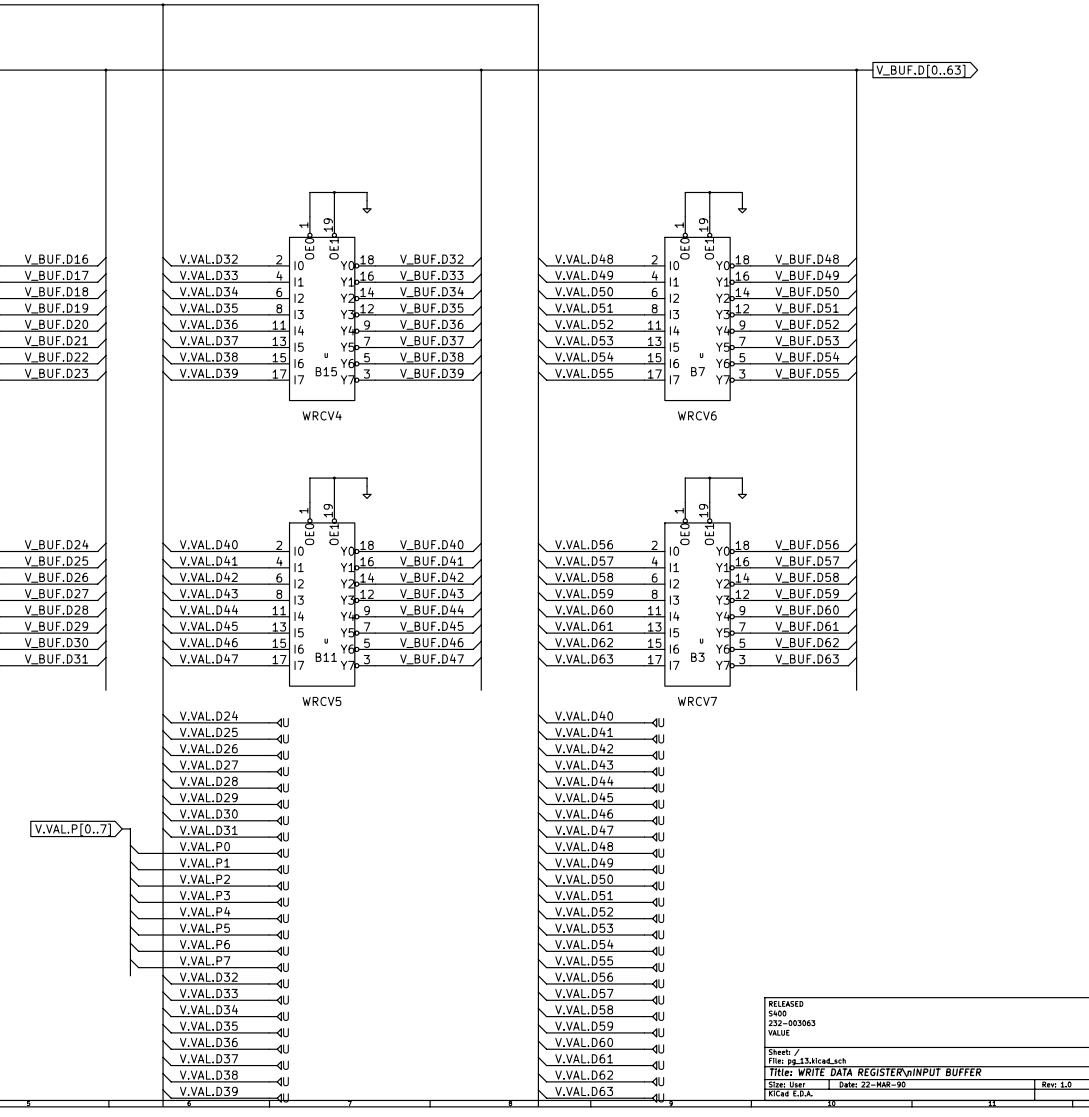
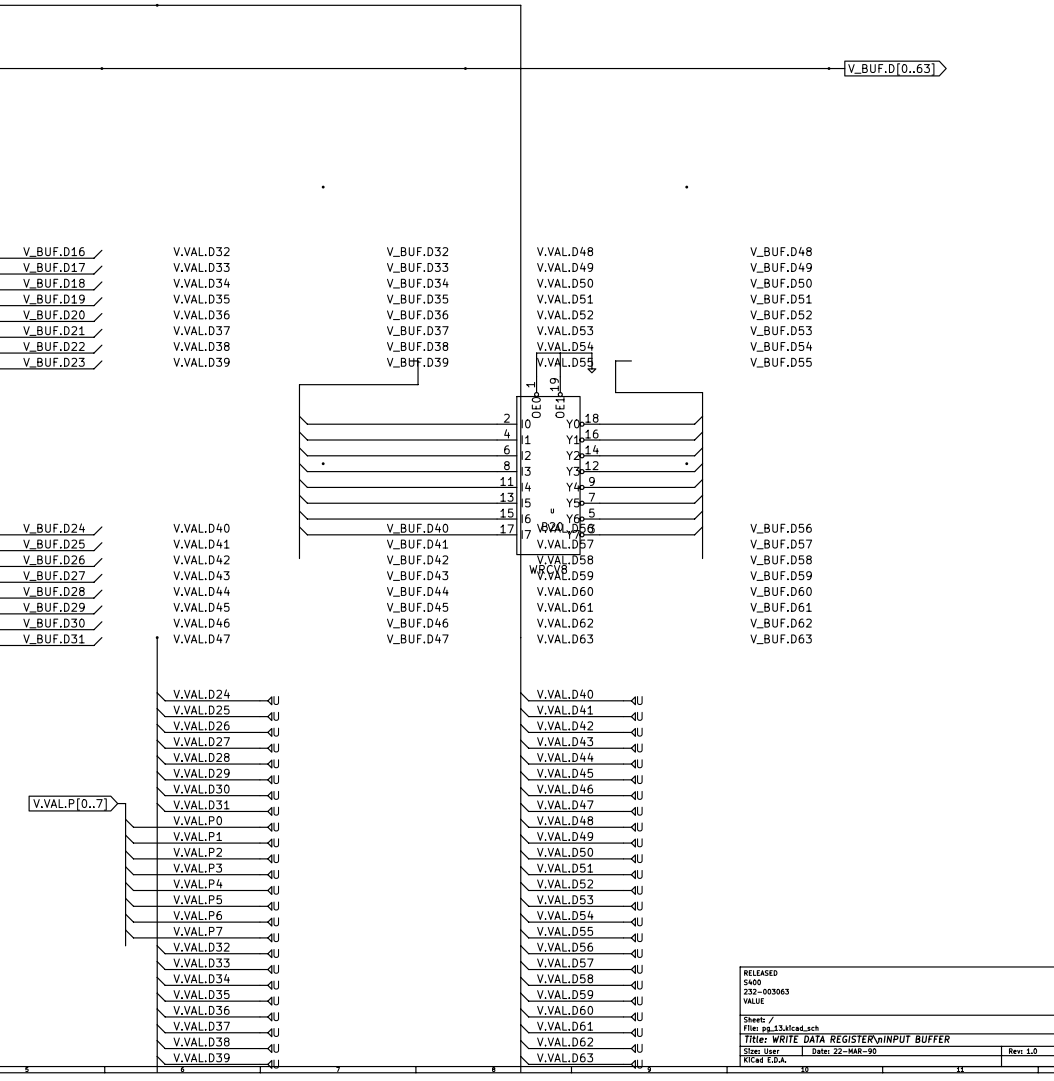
bus: (163, 4) (163, 657) -> none
bus: (105, 70) (105, 690) -> none
bus: (481, 70) (481, 690) -> none
bus: (856, 70) (856, 690) -> none
wire: (334, 192) (334, 216) -> none
wire: (709, 192) (709, 216) -> none
wire: (367, 200) (367, 192) (309, 192) (309, 216) -> none
wire: (742, 200) (742, 192) (685, 192) (685, 216) -> none
power symbol: (367, 206) -> none
power symbol: (742, 206) -> none
wire: (163, 257) (171, 265) (269, 265) -> none
wire: (481, 257) (473, 265) (375, 265) -> none
wire: (538, 257) (546, 265) (644, 265) -> none
wire: (856, 257) (848, 265) (750, 265) -> none
wire: (163, 274) (171, 282) (269, 282) -> none
wire: (481, 274) (473, 282) (375, 282) -> none
wire: (538, 274) (546, 282) (644, 282) -> none
wire: (856, 274) (848, 282) (750, 282) -> none
wire: (163, 290) (171, 298) (269, 298) -> none
wire: (481, 290) (473, 298) (375, 298) -> none
wire: (538, 290) (546, 298) (644, 298) -> none
wire: (856, 290) (848, 298) (750, 298) -> none
wire: (163, 306) (171, 314) (269, 314) -> none
wire: (481, 306) (473, 314) (375, 314) -> none
wire: (538, 306) (546, 314) (644, 314) -> none
wire: (856, 306) (848, 314) (750, 314) -> none
part: (322, 308) -> none
part: (697, 308) -> none
wire: (163, 323) (171, 331) (269, 331) -> none
wire: (481, 323) (473, 331) (375, 331) -> none
wire: (538, 323) (546, 331) (644, 331) -> none
wire: (856, 323) (848, 331) (750, 331) -> none
wire: (163, 339) (171, 347) (269, 347) -> none
wire: (481, 339) (473, 347) (375, 347) -> none
wire: (538, 339) (546, 347) (644, 347) -> none
wire: (856, 339) (848, 347) (750, 347) -> none
wire: (163, 355) (171, 363) (269, 363) -> none
wire: (481, 355) (473, 363) (375, 363) -> none
wire: (538, 355) (546, 363) (554, 363) -> (536, 376) (536, 353)
wire: (856, 355) (848, 363) (750, 363) -> none
wire: none -> (560, 353) (560, 376)
wire: (611, 363) (644, 363) -> (591, 353) (591, 360)
wire: (163, 371) (171, 380) (269, 380) -> none
bus: none -> (410, 360) (418, 360) (418, 384) (299, 384) (299, 558)
wire: (481, 371) (473, 380) (375, 380) -> none
wire: (538, 371) (546, 380) (644, 380) -> none
bus: none -> (631, 360) (615, 360) (615, 392) (702, 392) (702, 558)
wire: (856, 371) (848, 380) (750, 380) -> none
power symbol: none -> (591, 367)
wire: none -> (299, 416) (307, 424) (497, 424)
wire: none -> (702, 416) (694, 424) (599, 424)
wire: none -> (299, 432) (307, 440) (497, 440)
wire: none -> (702, 432) (694, 440) (599, 440)
wire: none -> (299, 447) (307, 455) (497, 455)
wire: none -> (702, 447) (694, 455) (599, 455)
wire: none -> (299, 463) (307, 471) (497, 471)
wire: (334, 478) (334, 502) -> none
wire: (709, 478) (709, 502) -> none
wire: none -> (702, 463) (694, 471) (599, 471)
part: none -> (548, 465)
wire: (367, 486) (367, 478) (309, 478) (309, 502) -> none
wire: (742, 486) (742, 478) (685, 478) (685, 502) -> none
power symbol: (367, 492) -> none
power symbol: (742, 492) -> none
wire: none -> (299, 479) (307, 487) (497, 487)
wire: none -> (702, 479) (694, 487) (599, 487)
wire: none -> (299, 495) (307, 503) (497, 503)
wire: none -> (702, 495) (694, 503) (599, 503)
wire: none -> (299, 511) (307, 519) (497, 519)
wire: none -> (702, 511) (694, 519) (599, 519)
wire: (163, 543) (171, 551) (269, 551) -> none
wire: none -> (299, 526) (307, 534) (362, 534)
wire: (481, 543) (473, 551) -> (497, 534) (457, 534)
wire: (538, 543) (546, 551) (619, 551) -> none
wire: none -> (702, 526) (694, 534) (623, 534)
wire: (856, 543) (848, 551) (750, 551) -> none
wire: (163, 559) (171, 567) (269, 567) -> none
wire: (481, 559) (473, 567) (375, 567) -> none
wire: (538, 559) (546, 567) (644, 567) -> none
wire: (856, 559) (848, 567) (750, 567) -> none
wire: (163, 575) (171, 584) (269, 584) -> none
wire: (481, 575) (473, 584) (375, 584) -> none
wire: (538, 575) (546, 584) (644, 584) -> none
wire: (856, 575) (848, 584) (750, 584) -> none
wire: (163, 592) (171, 600) (269, 600) -> none
wire: (481, 592) (473, 600) (375, 600) -> none
wire: (538, 592) (546, 600) (644, 600) -> none
wire: (856, 592) (848, 600) (750, 600) -> none
part: (322, 594) -> none
part: (697, 594) -> none
wire: (163, 608) (171, 616) (269, 616) -> none
wire: (481, 608) (473, 616) (375, 616) -> none
wire: (538, 608) (546, 616) (644, 616) -> none
wire: (856, 608) (848, 616) (750, 616) -> none
wire: (163, 624) (171, 633) (269, 633) -> none
wire: (481, 624) (473, 633) (375, 633) -> none
wire: (538, 624) (546, 633) (644, 633) -> none
wire: (856, 624) (848, 633) (750, 633) -> none
wire: (163, 641) (171, 649) (269, 649) -> none
wire: (481, 641) (473, 649) (375, 649) -> none
wire: (538, 641) (546, 649) (644, 649) -> none
wire: (856, 641) (848, 649) (750, 649) -> none
wire: (163, 657) (171, 665) (269, 665) -> none
junction: none -> (157, 637)
wire: (481, 657) (473, 665) (375, 665) -> none
wire: (538, 657) (546, 665) (644, 665) -> none
wire: (856, 657) (848, 665) (750, 665) -> none

